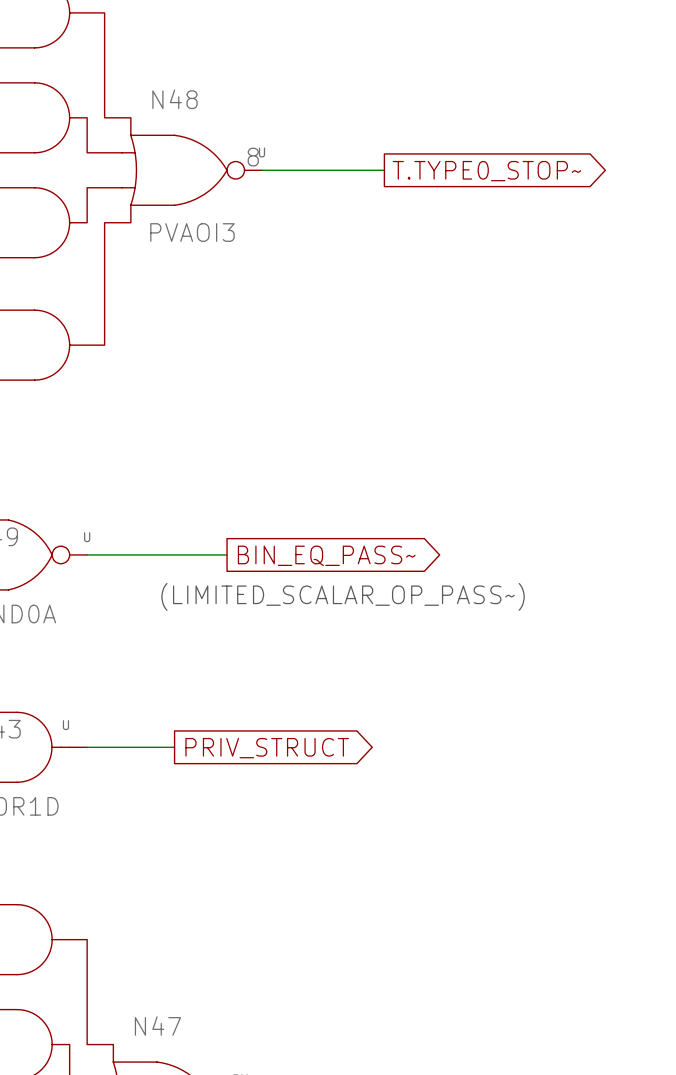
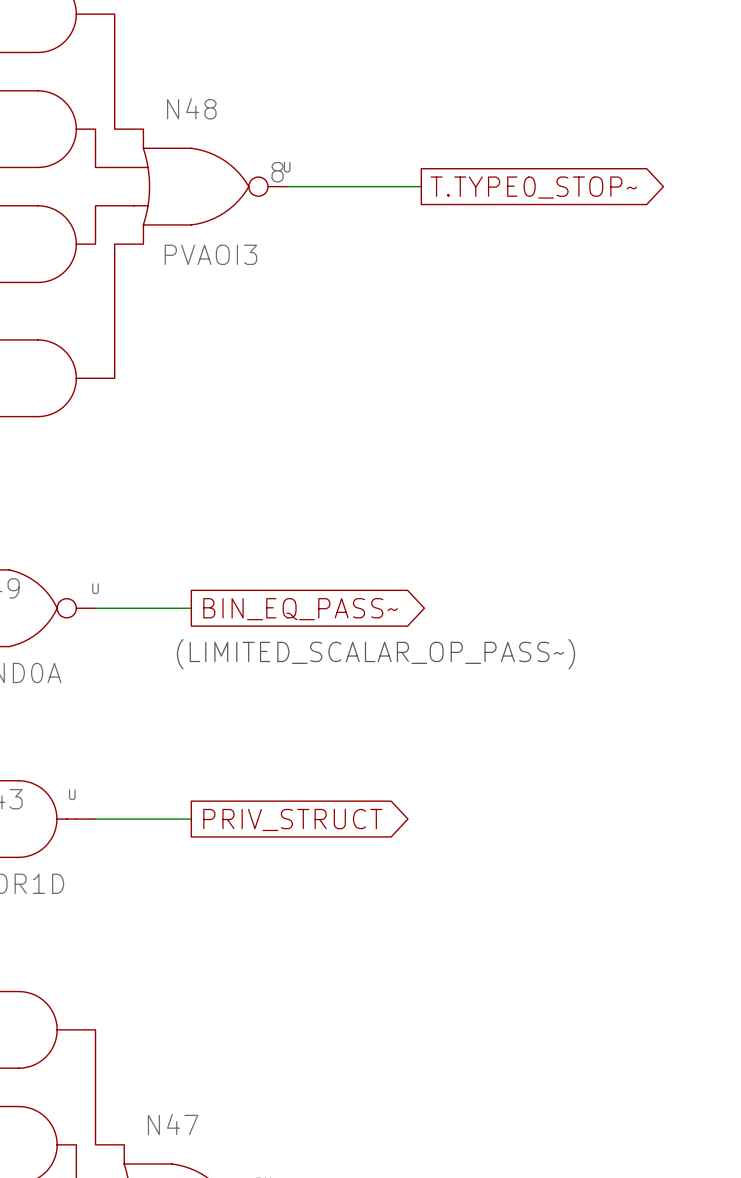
wire: (174, 554) (227, 554) -> none
global label position: BIN_EQ_PASS~ (326, 555) -> BIN_EQ_PASS~ (300, 609)

